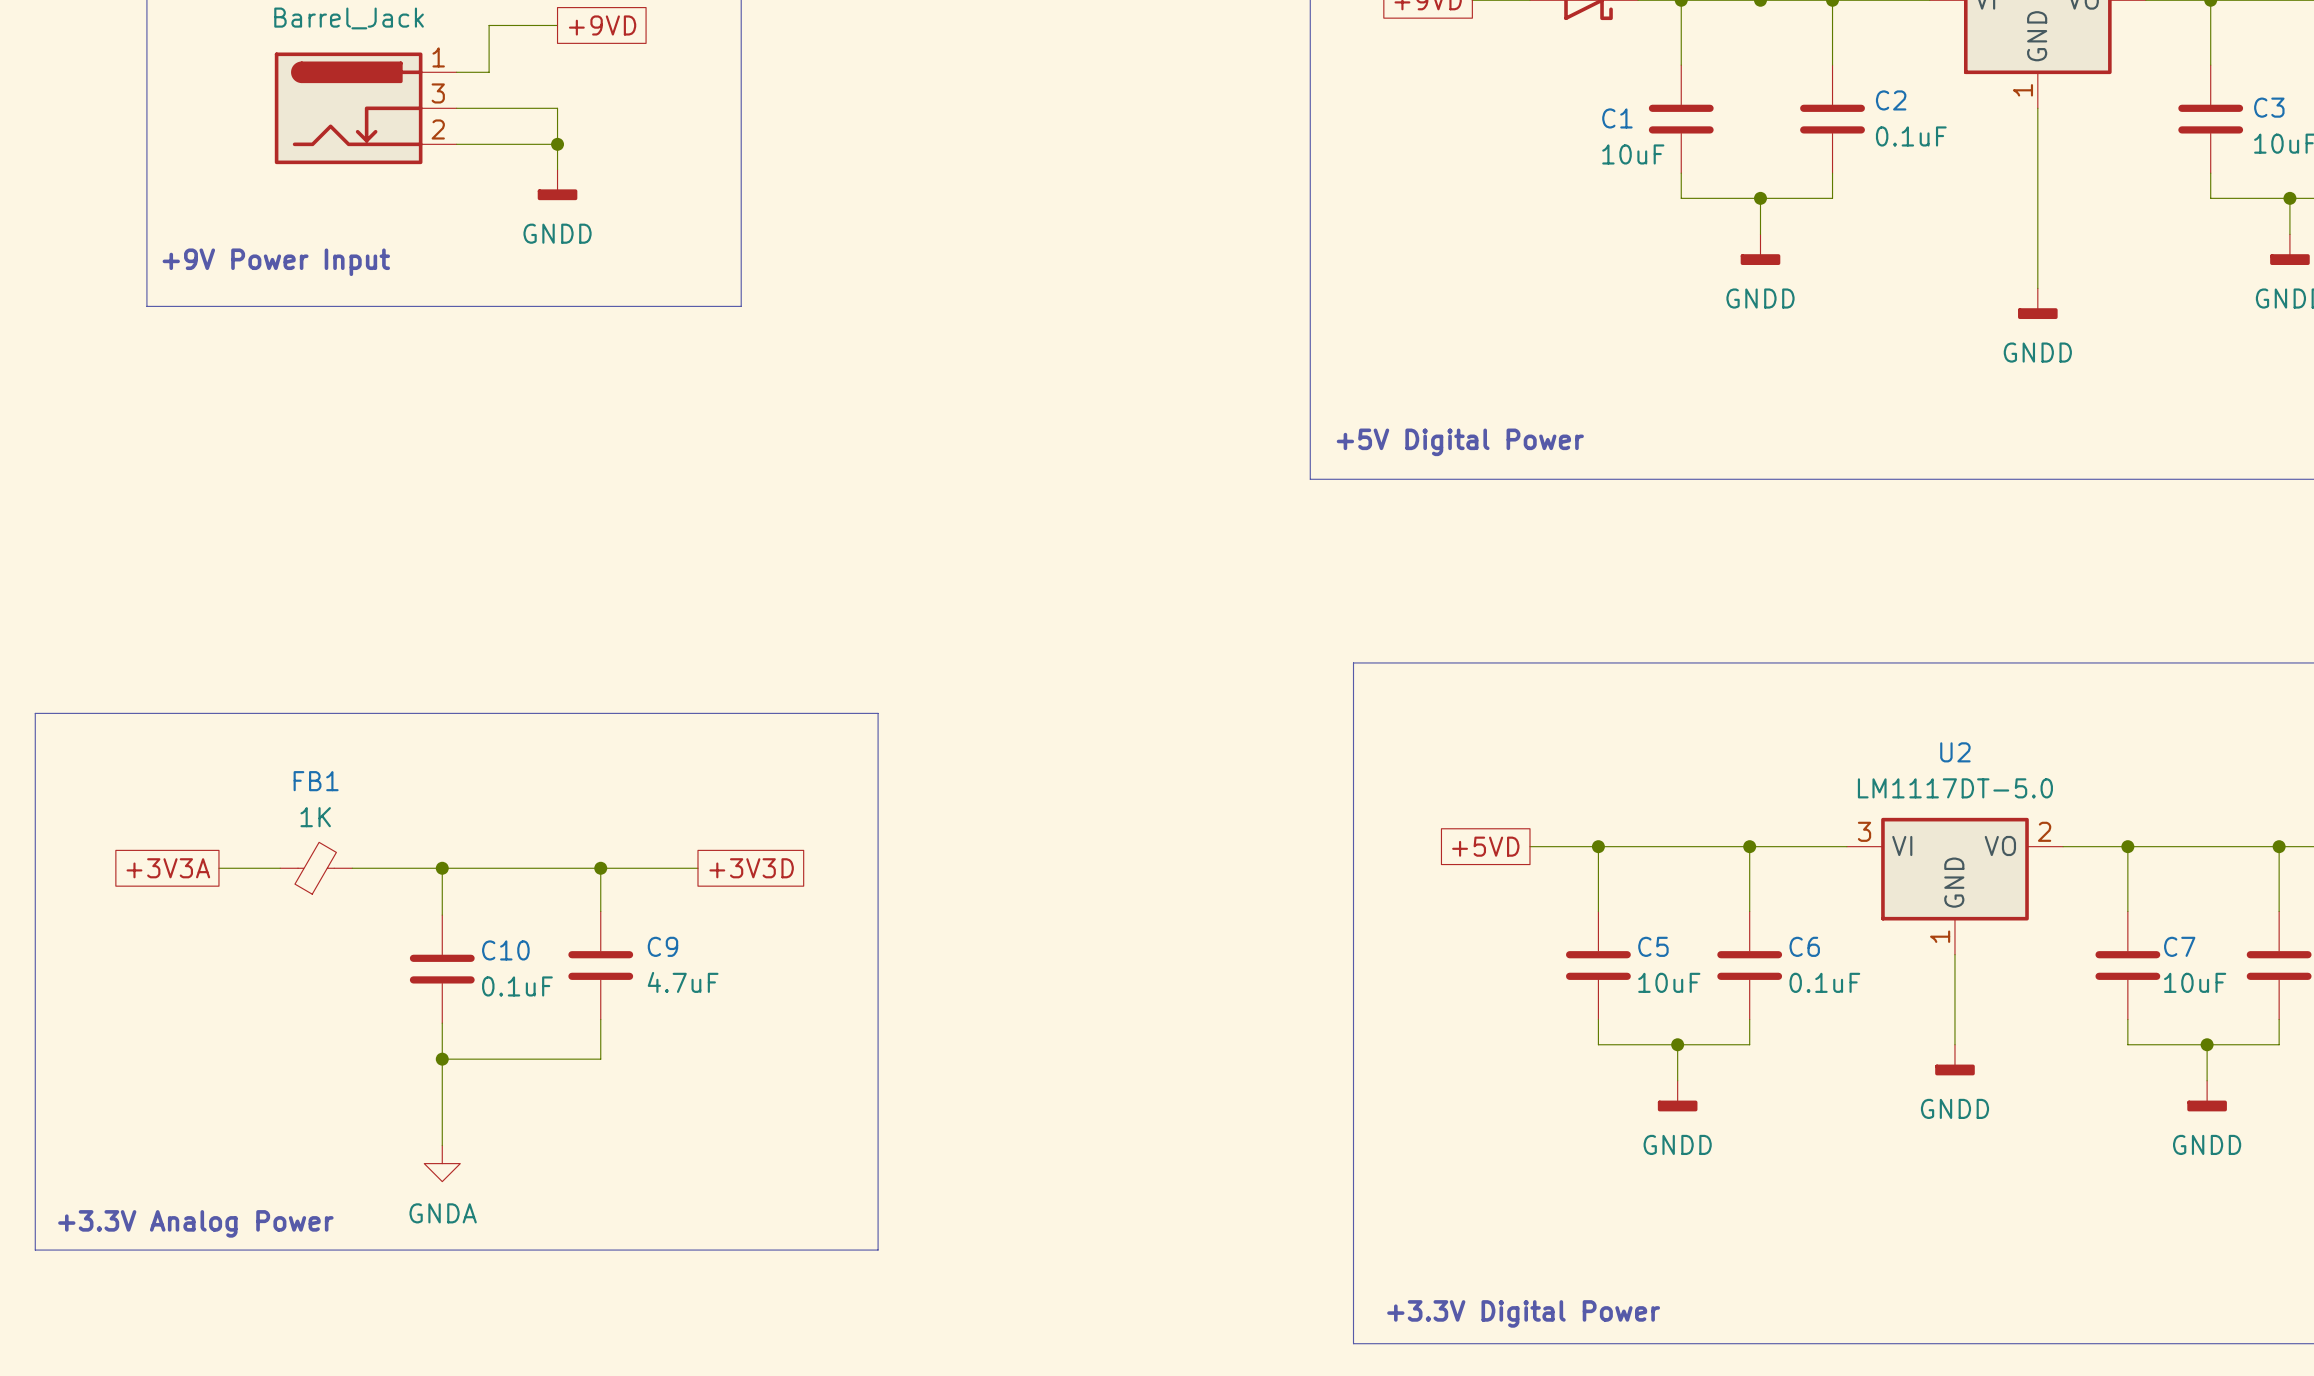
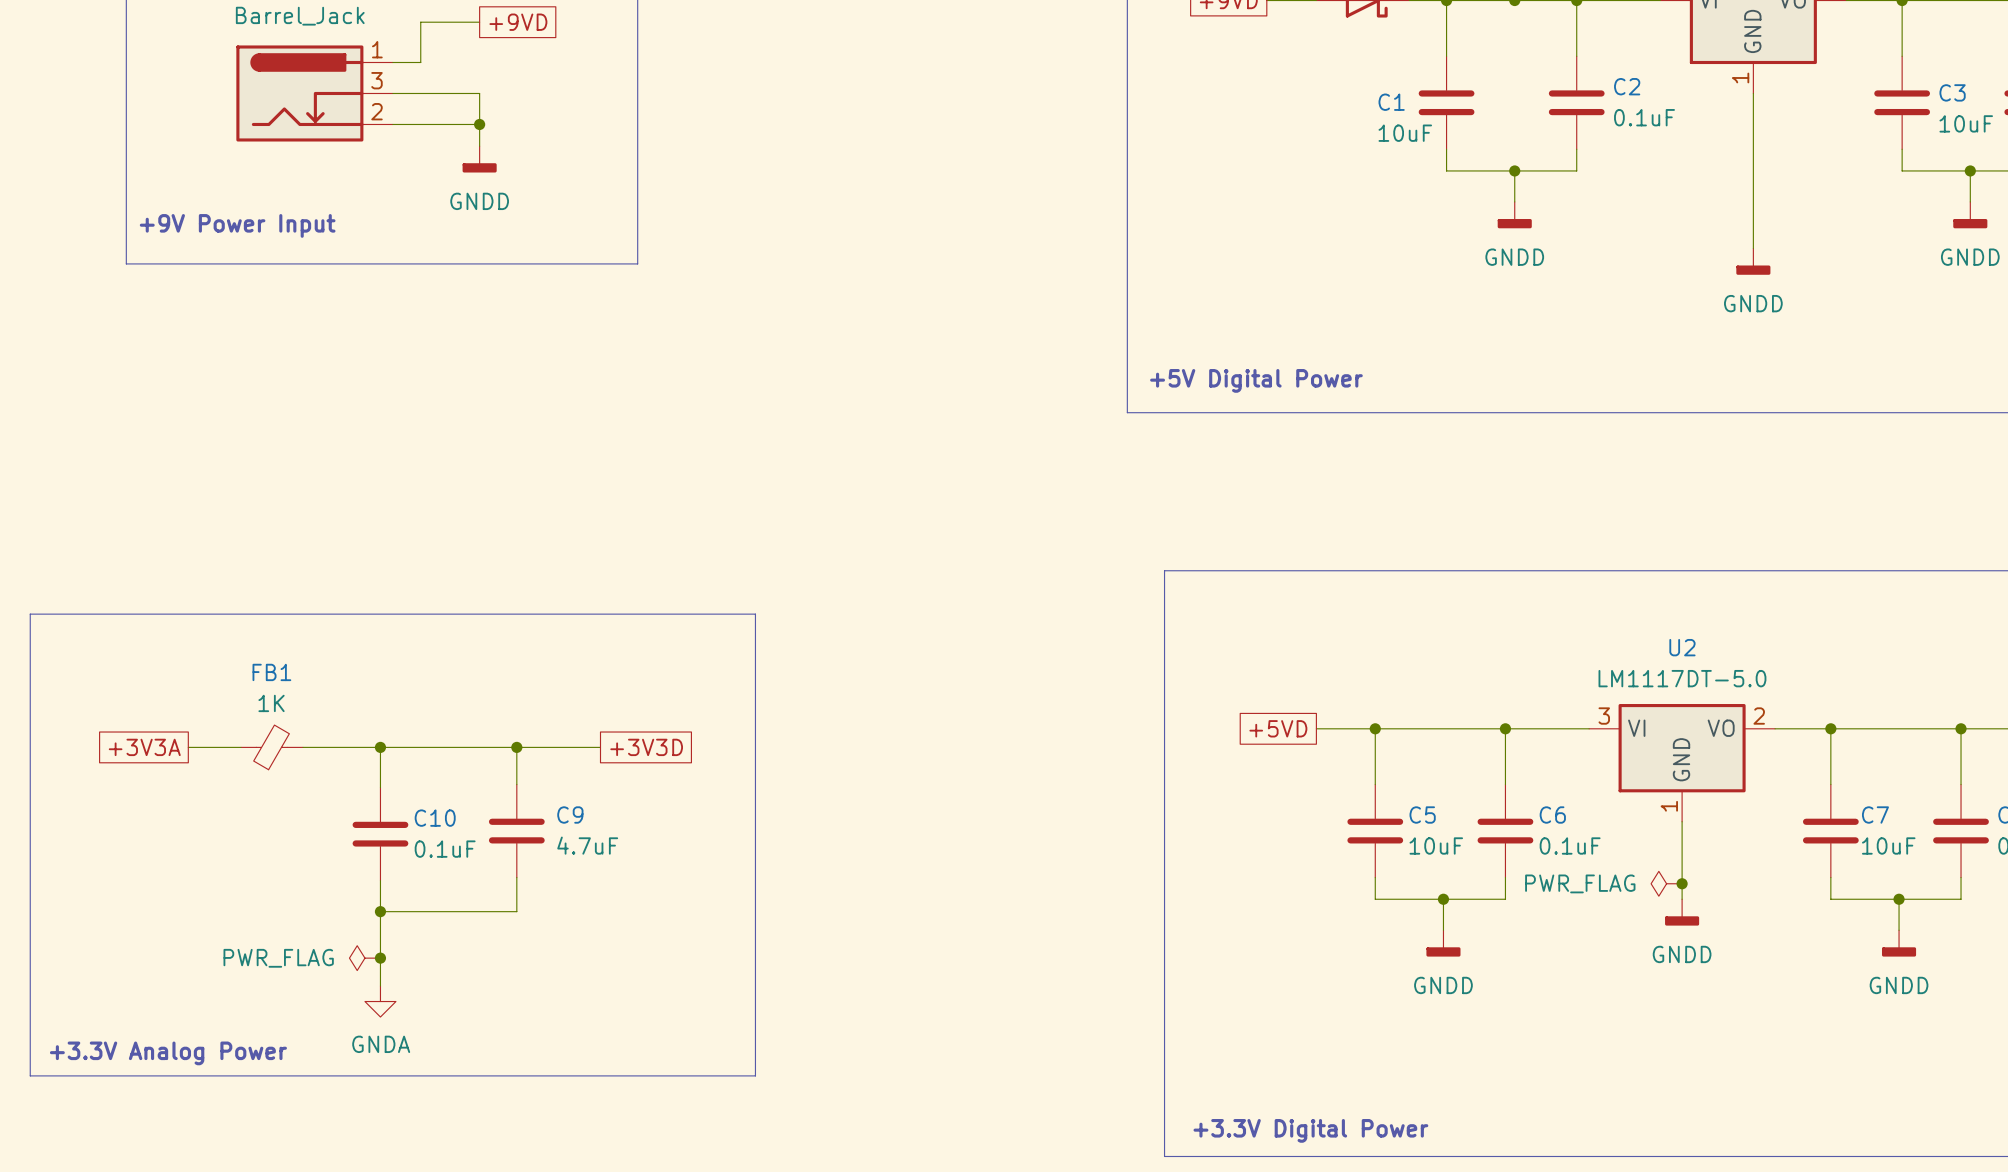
power symbol: none -> PWR_FLAG (1666, 883)
junction: none -> (1682, 883)
power symbol: none -> PWR_FLAG (364, 958)
junction: none -> (380, 958)

